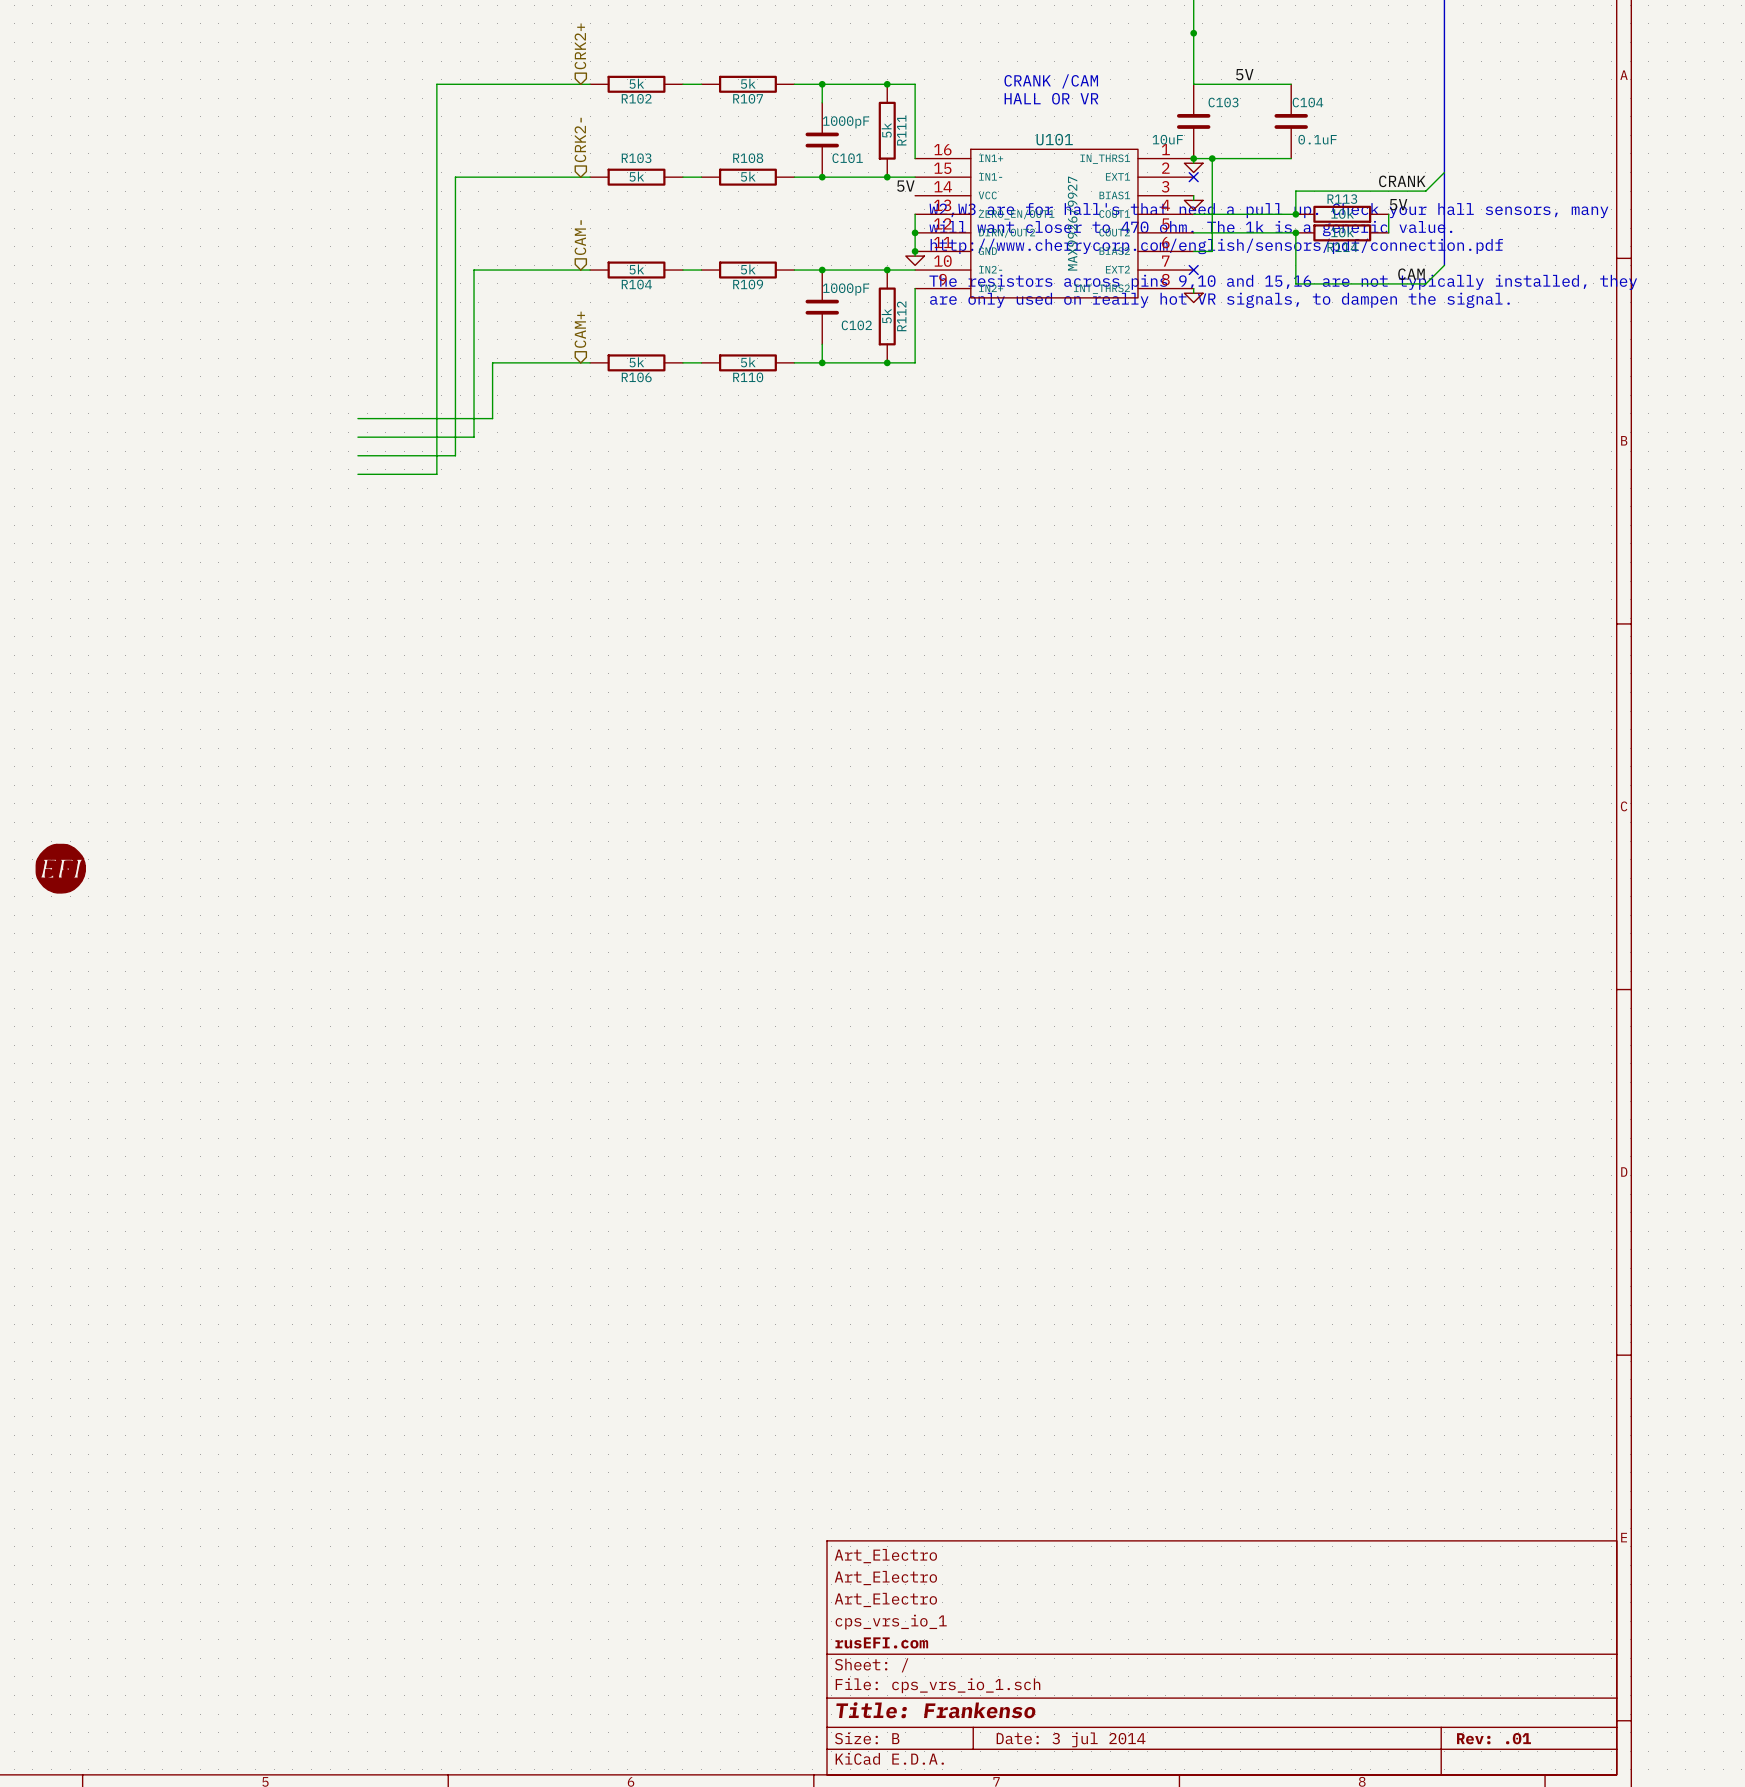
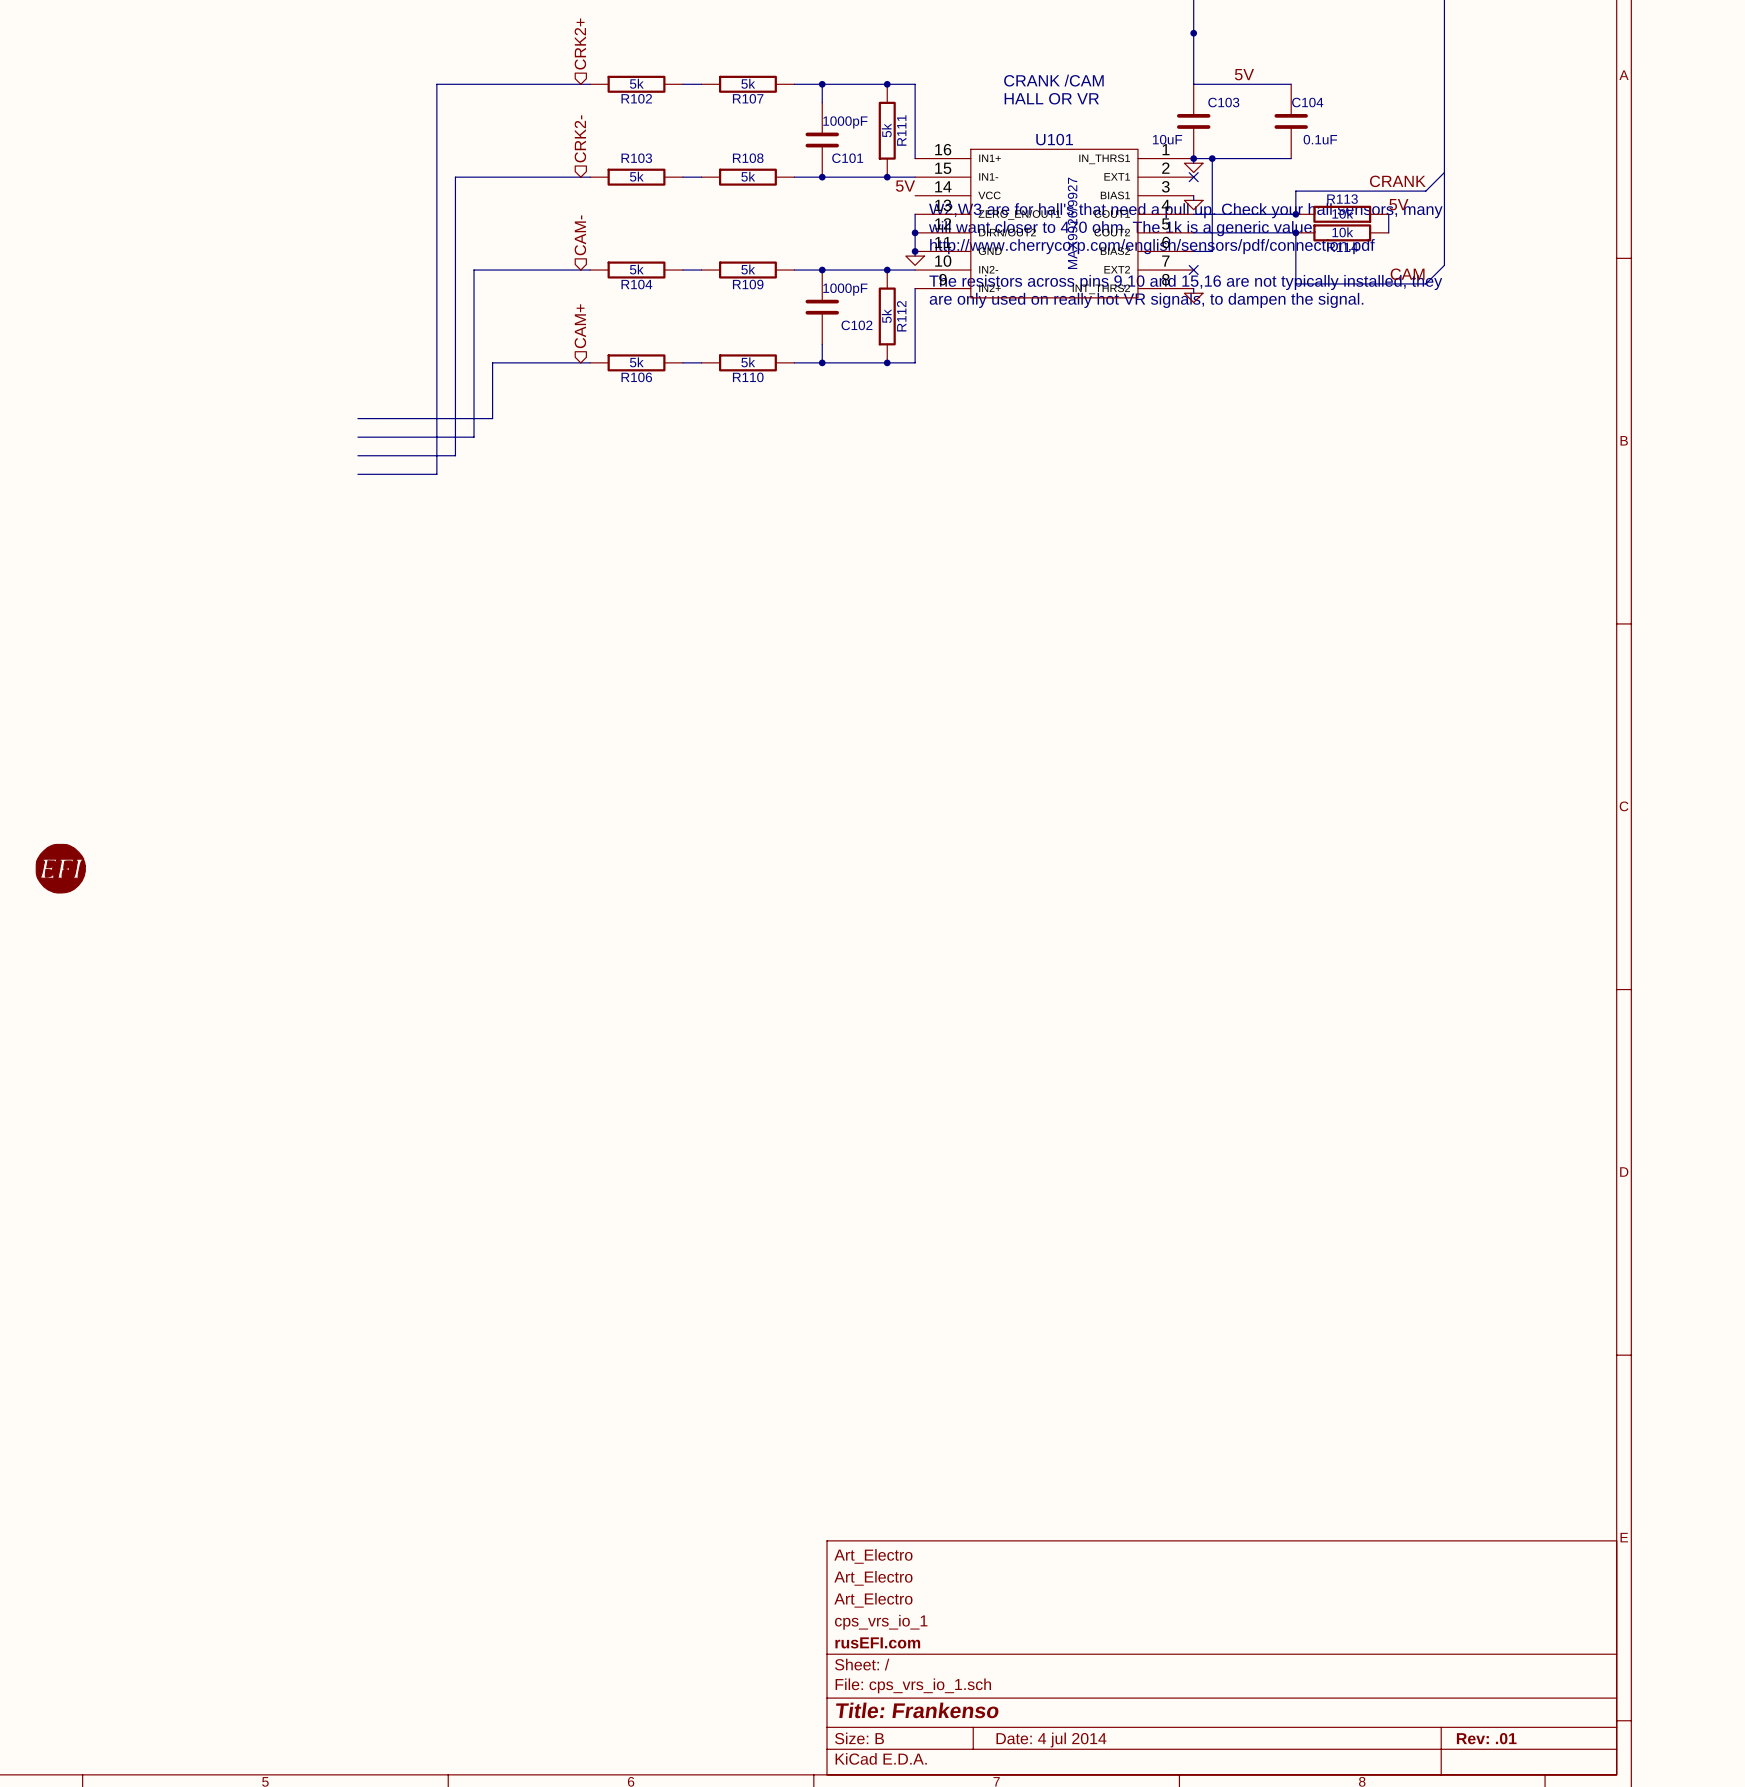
title block: Date: 3 jul 2014 (1071, 1739) -> Date: 4 jul 2014 (1051, 1739)

